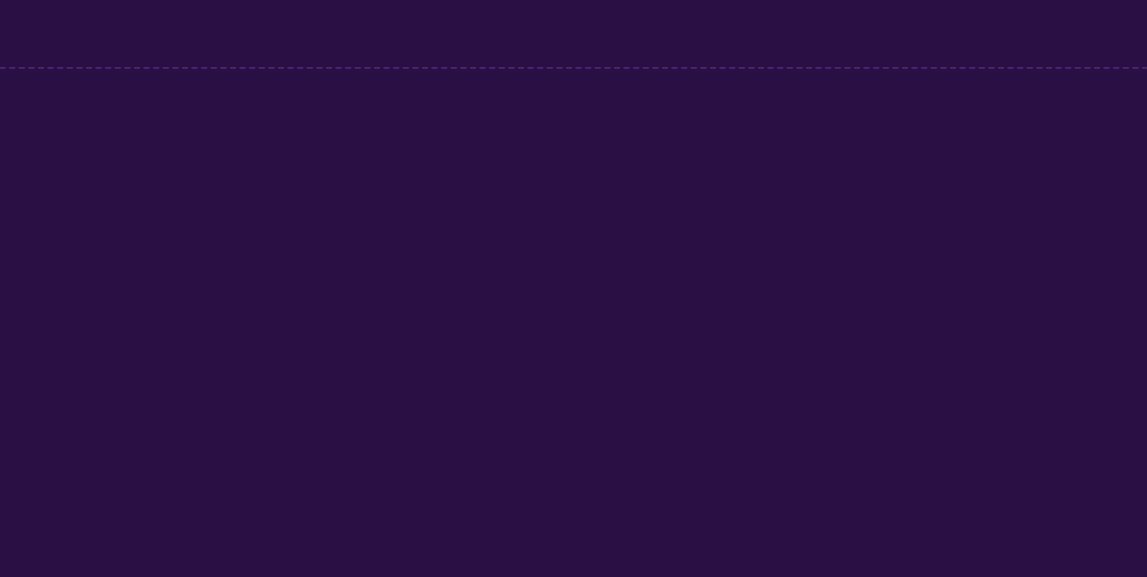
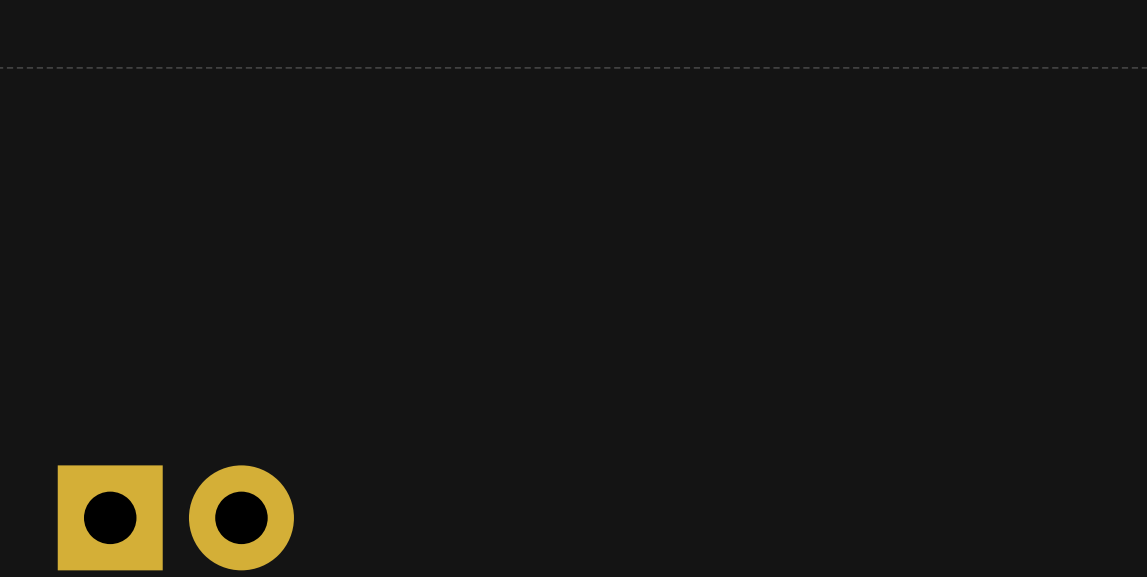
part: none -> (175, 517)

